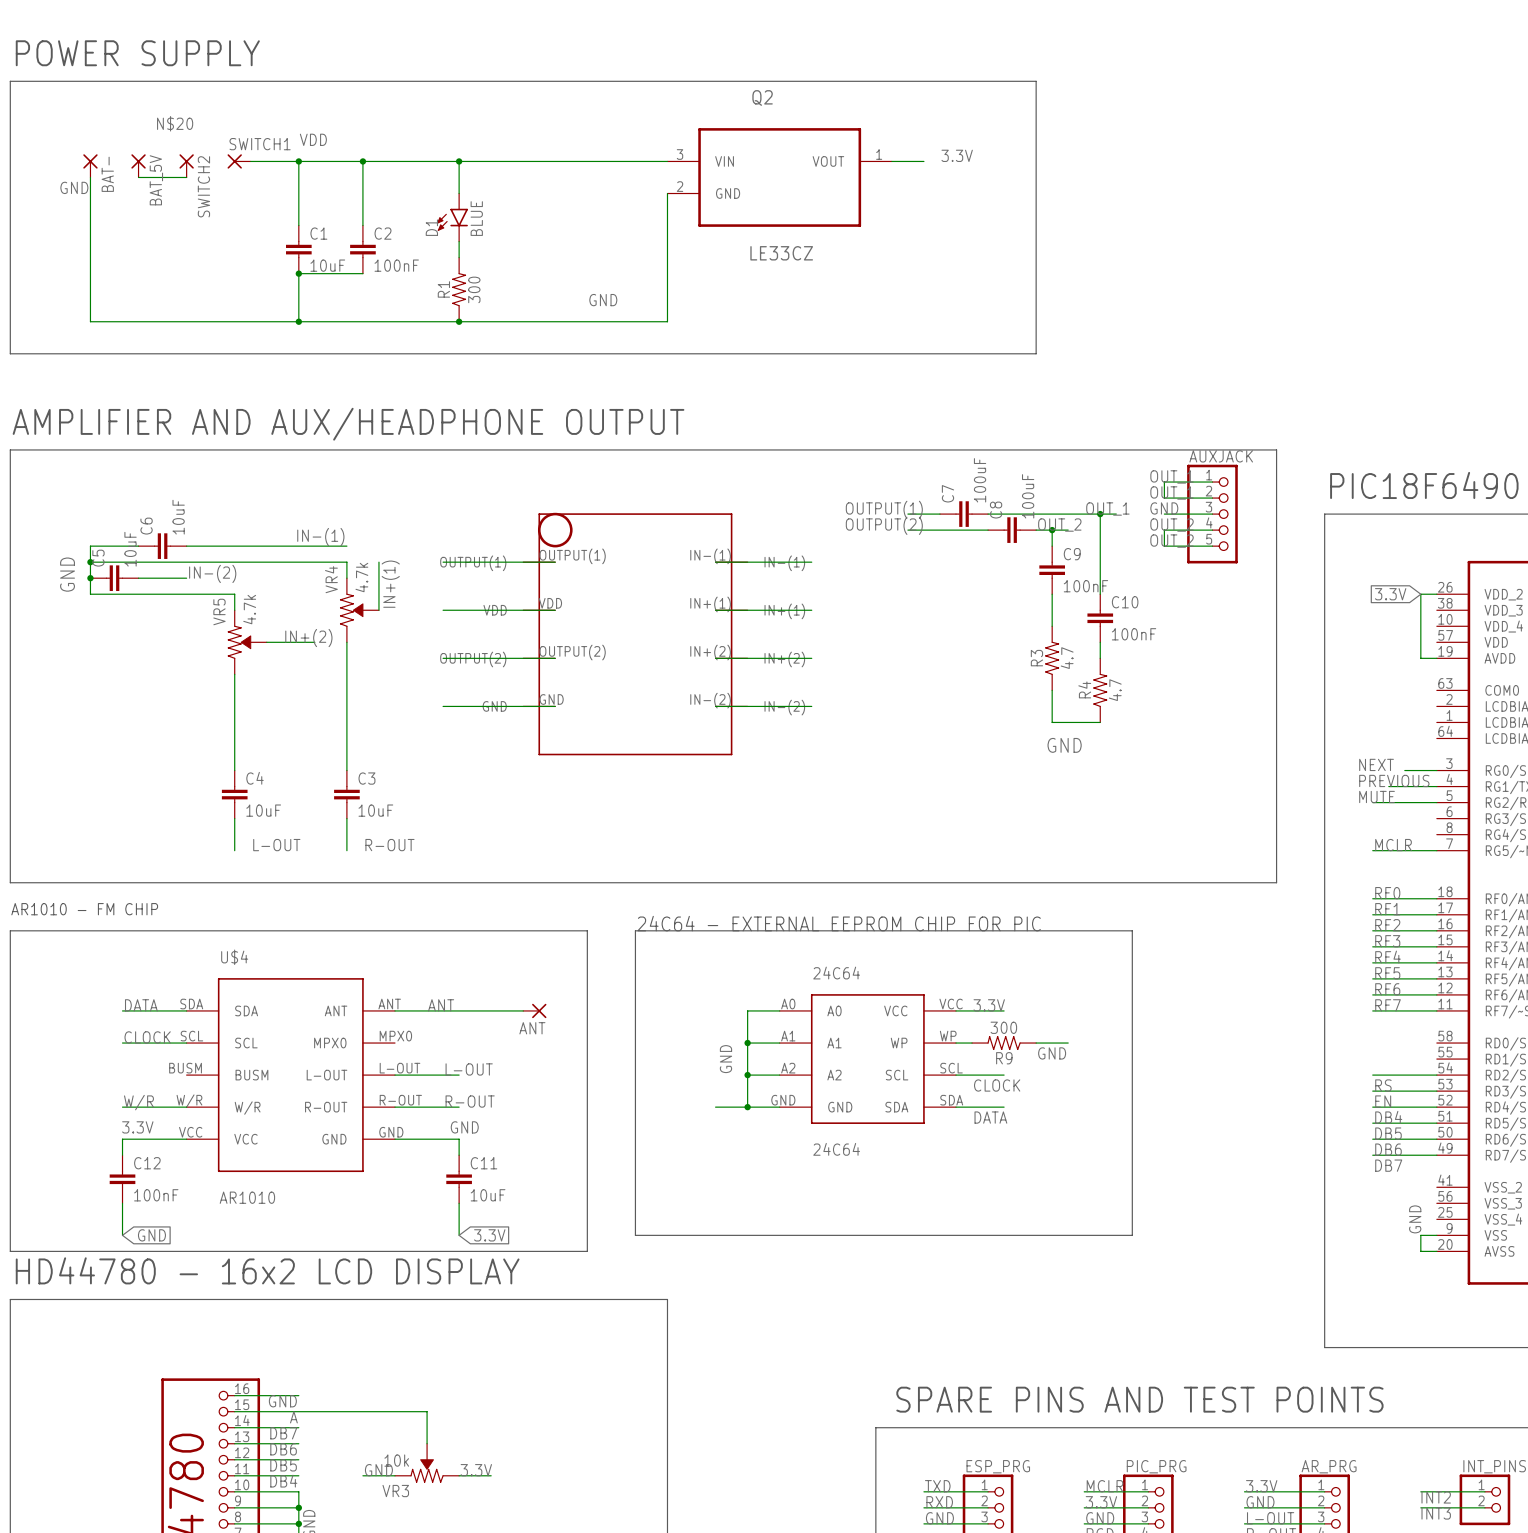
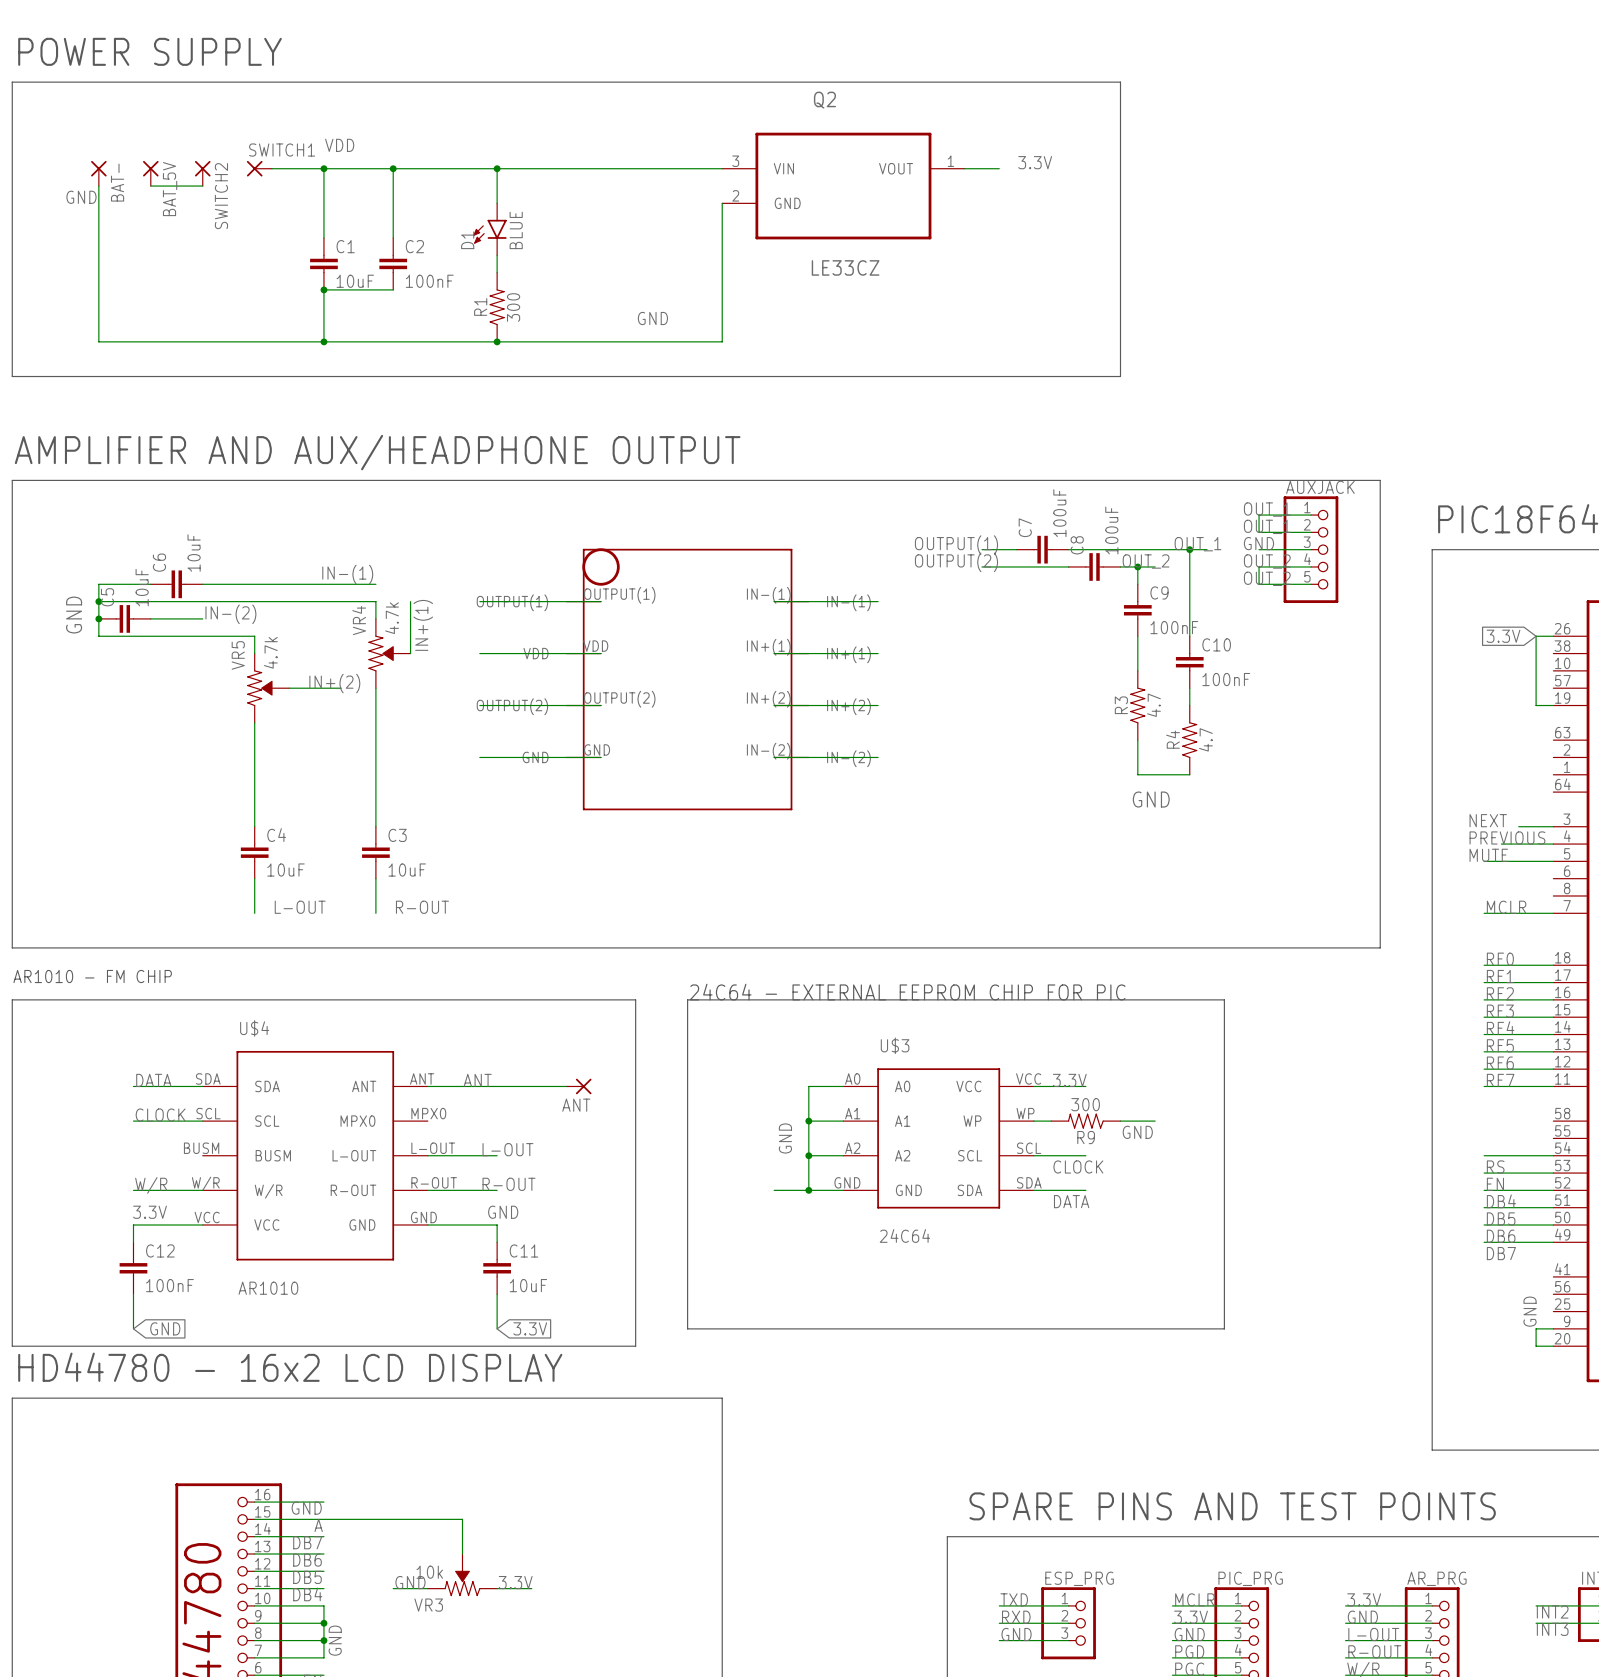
label: N$20 (175, 123) -> none
24C64 name: 24C64 (836, 973) -> U$3 (895, 1045)

